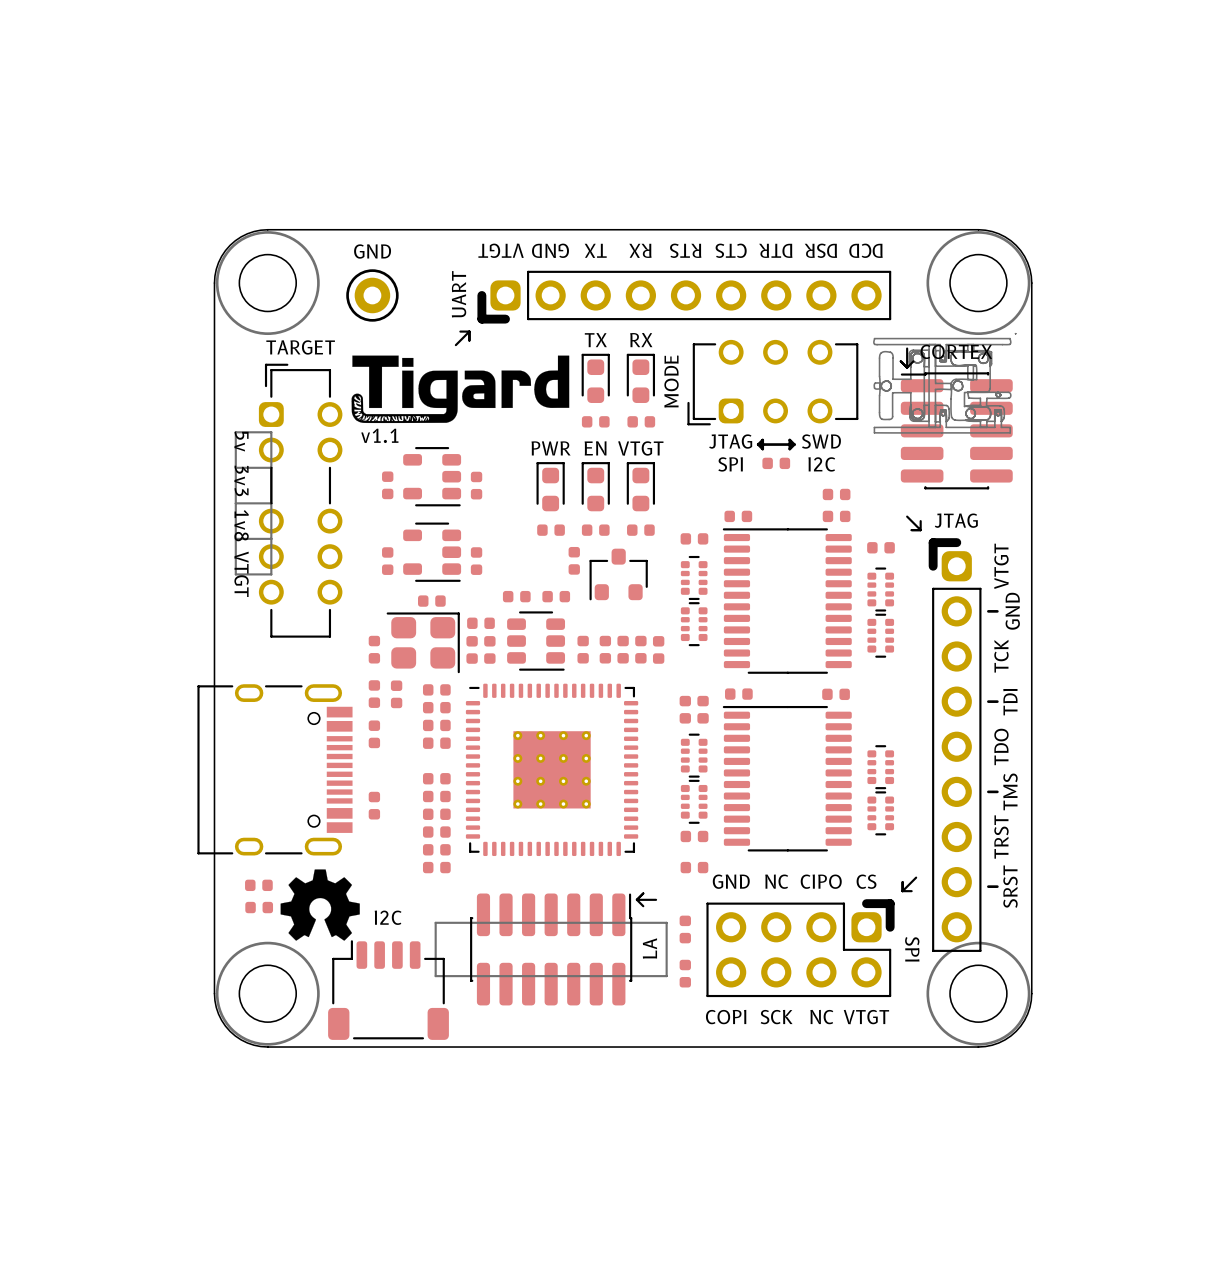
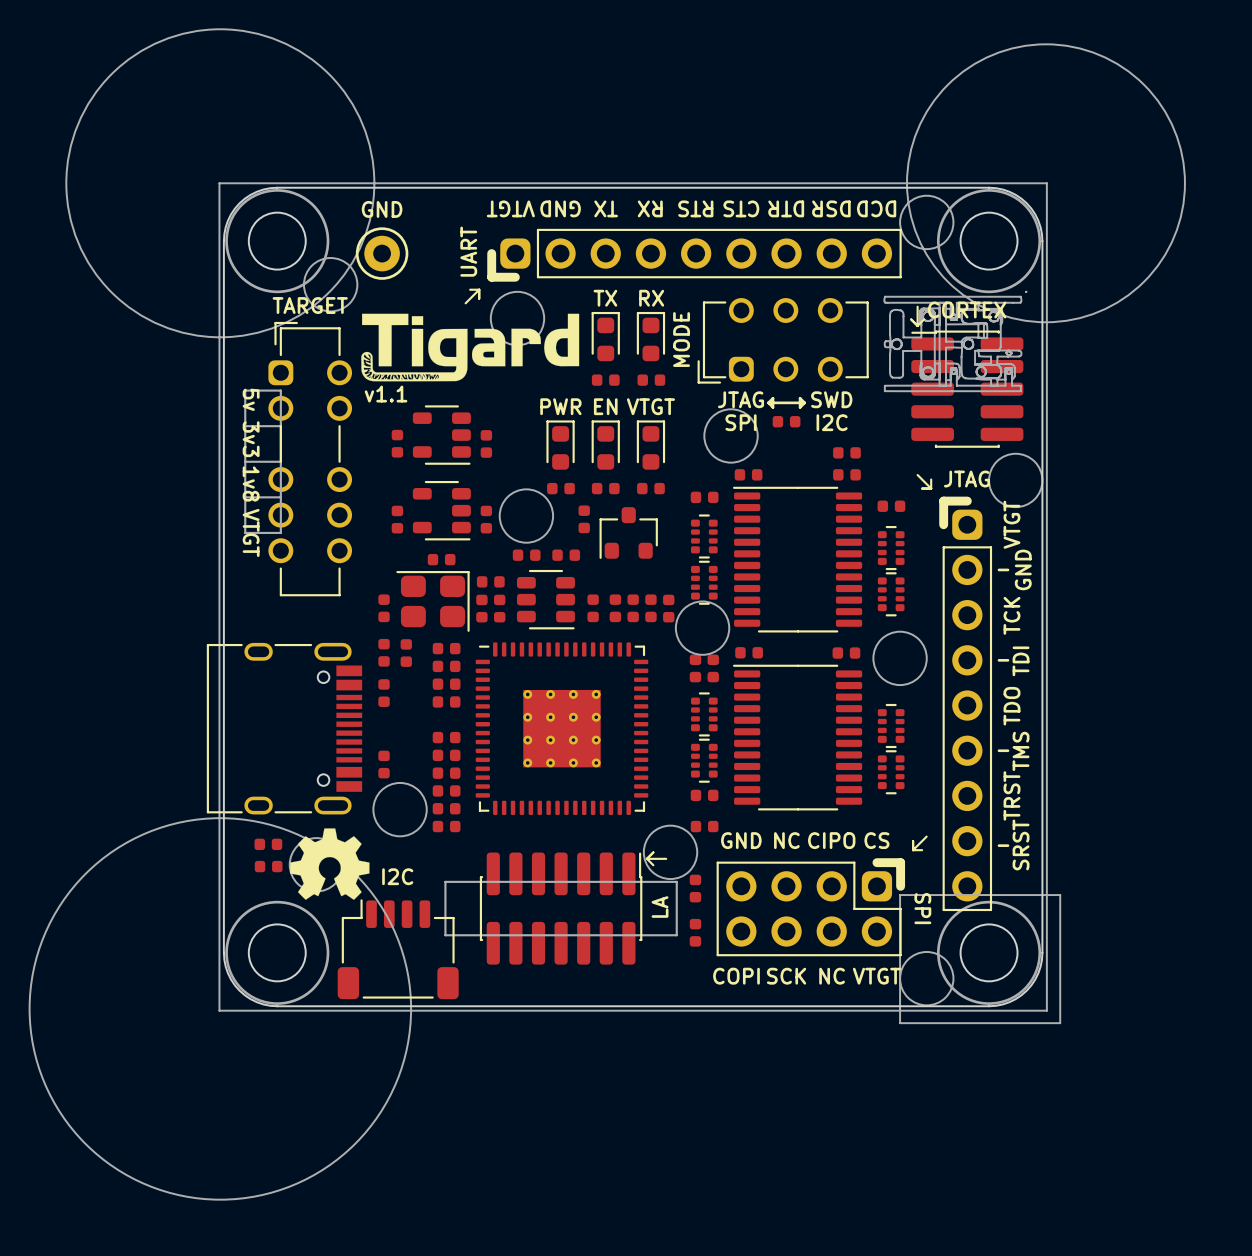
drawing: none -> [65, 28, 376, 339]
drawing: none -> [899, 43, 1186, 324]
line: none -> (219, 183) (1046, 183) (1046, 1010) (219, 1010) (219, 183)
drawing: none -> [489, 290, 546, 347]
drawing: none -> [703, 408, 759, 464]
drawing: none -> [988, 452, 1044, 509]
drawing: none -> [498, 488, 554, 544]
drawing: none -> [674, 600, 731, 656]
drawing: none -> [872, 630, 928, 686]
drawing: none -> [28, 782, 428, 1201]
drawing: none -> [642, 824, 699, 880]
line: none -> (900, 895) (1060, 895) (1060, 1023) (900, 1023) (900, 895)
drawing: none -> [899, 951, 955, 1007]

